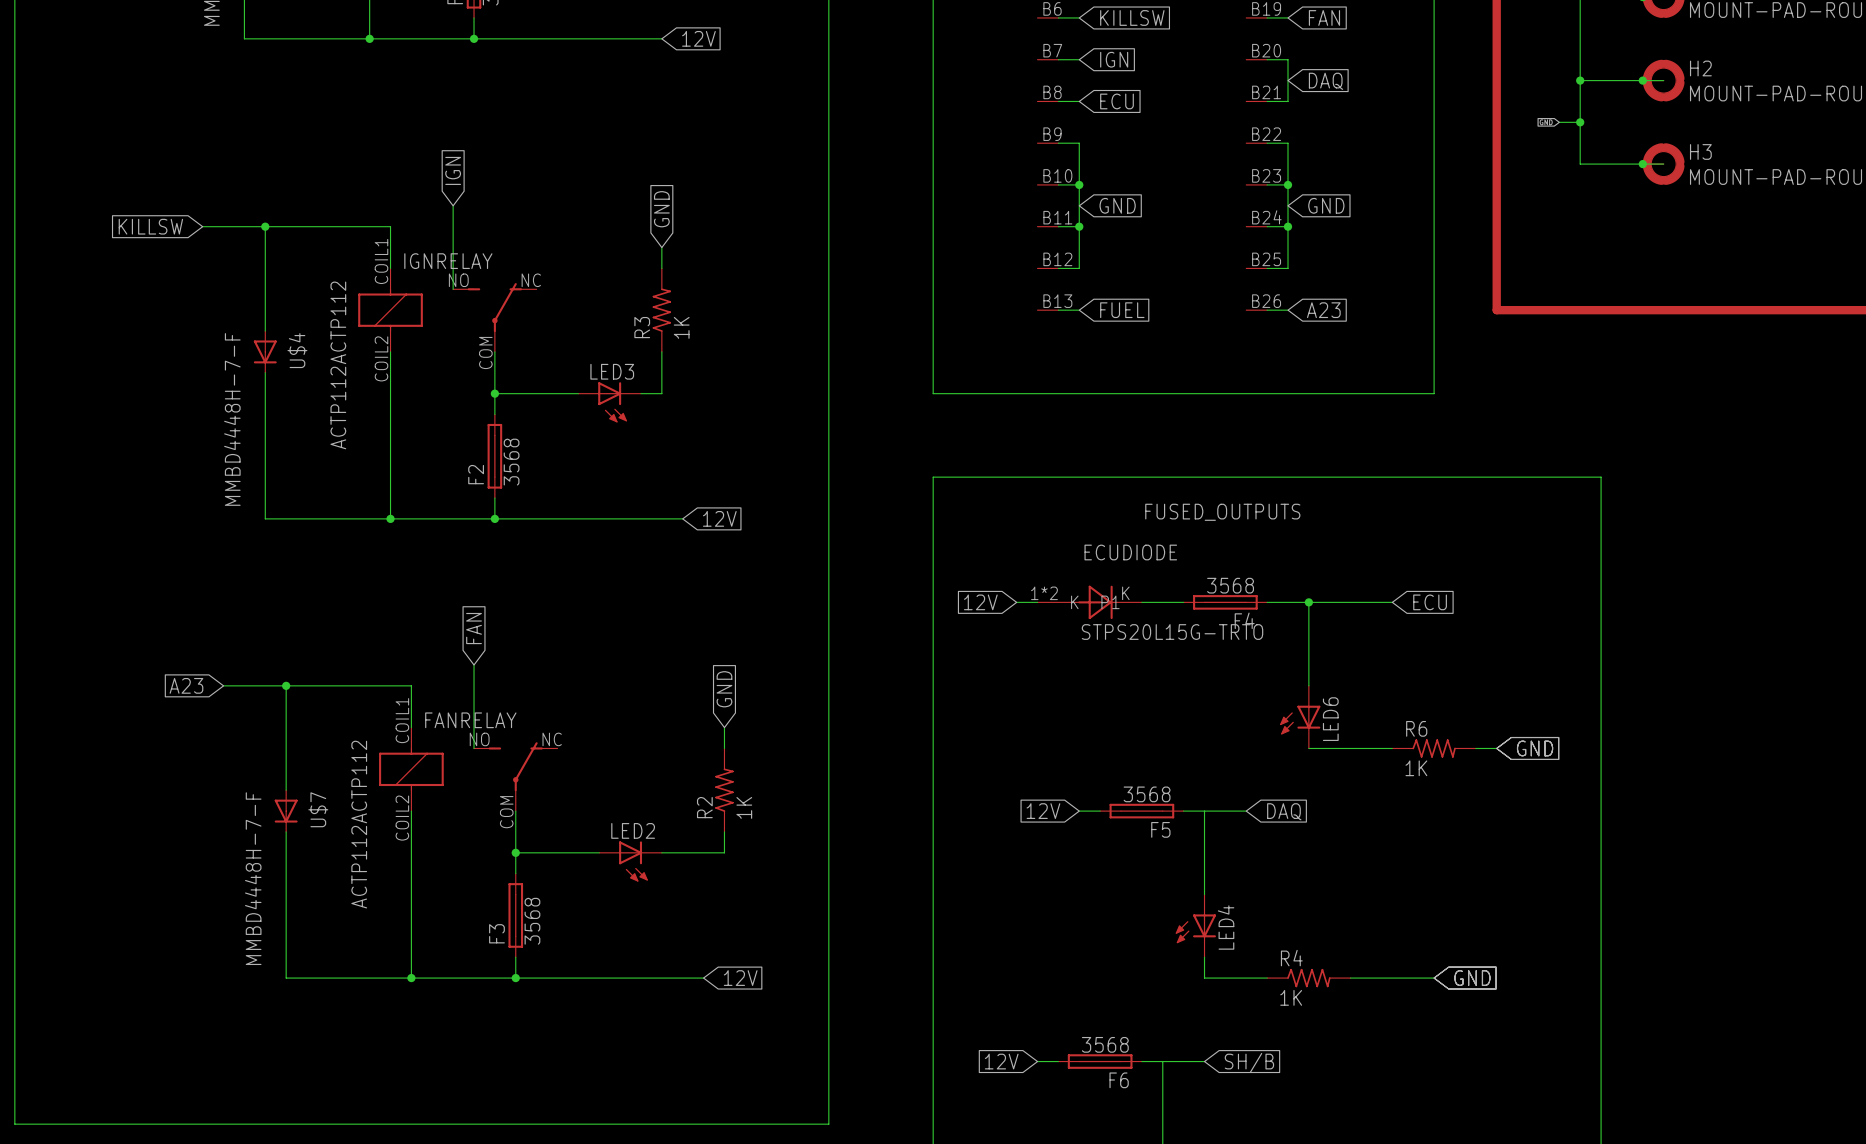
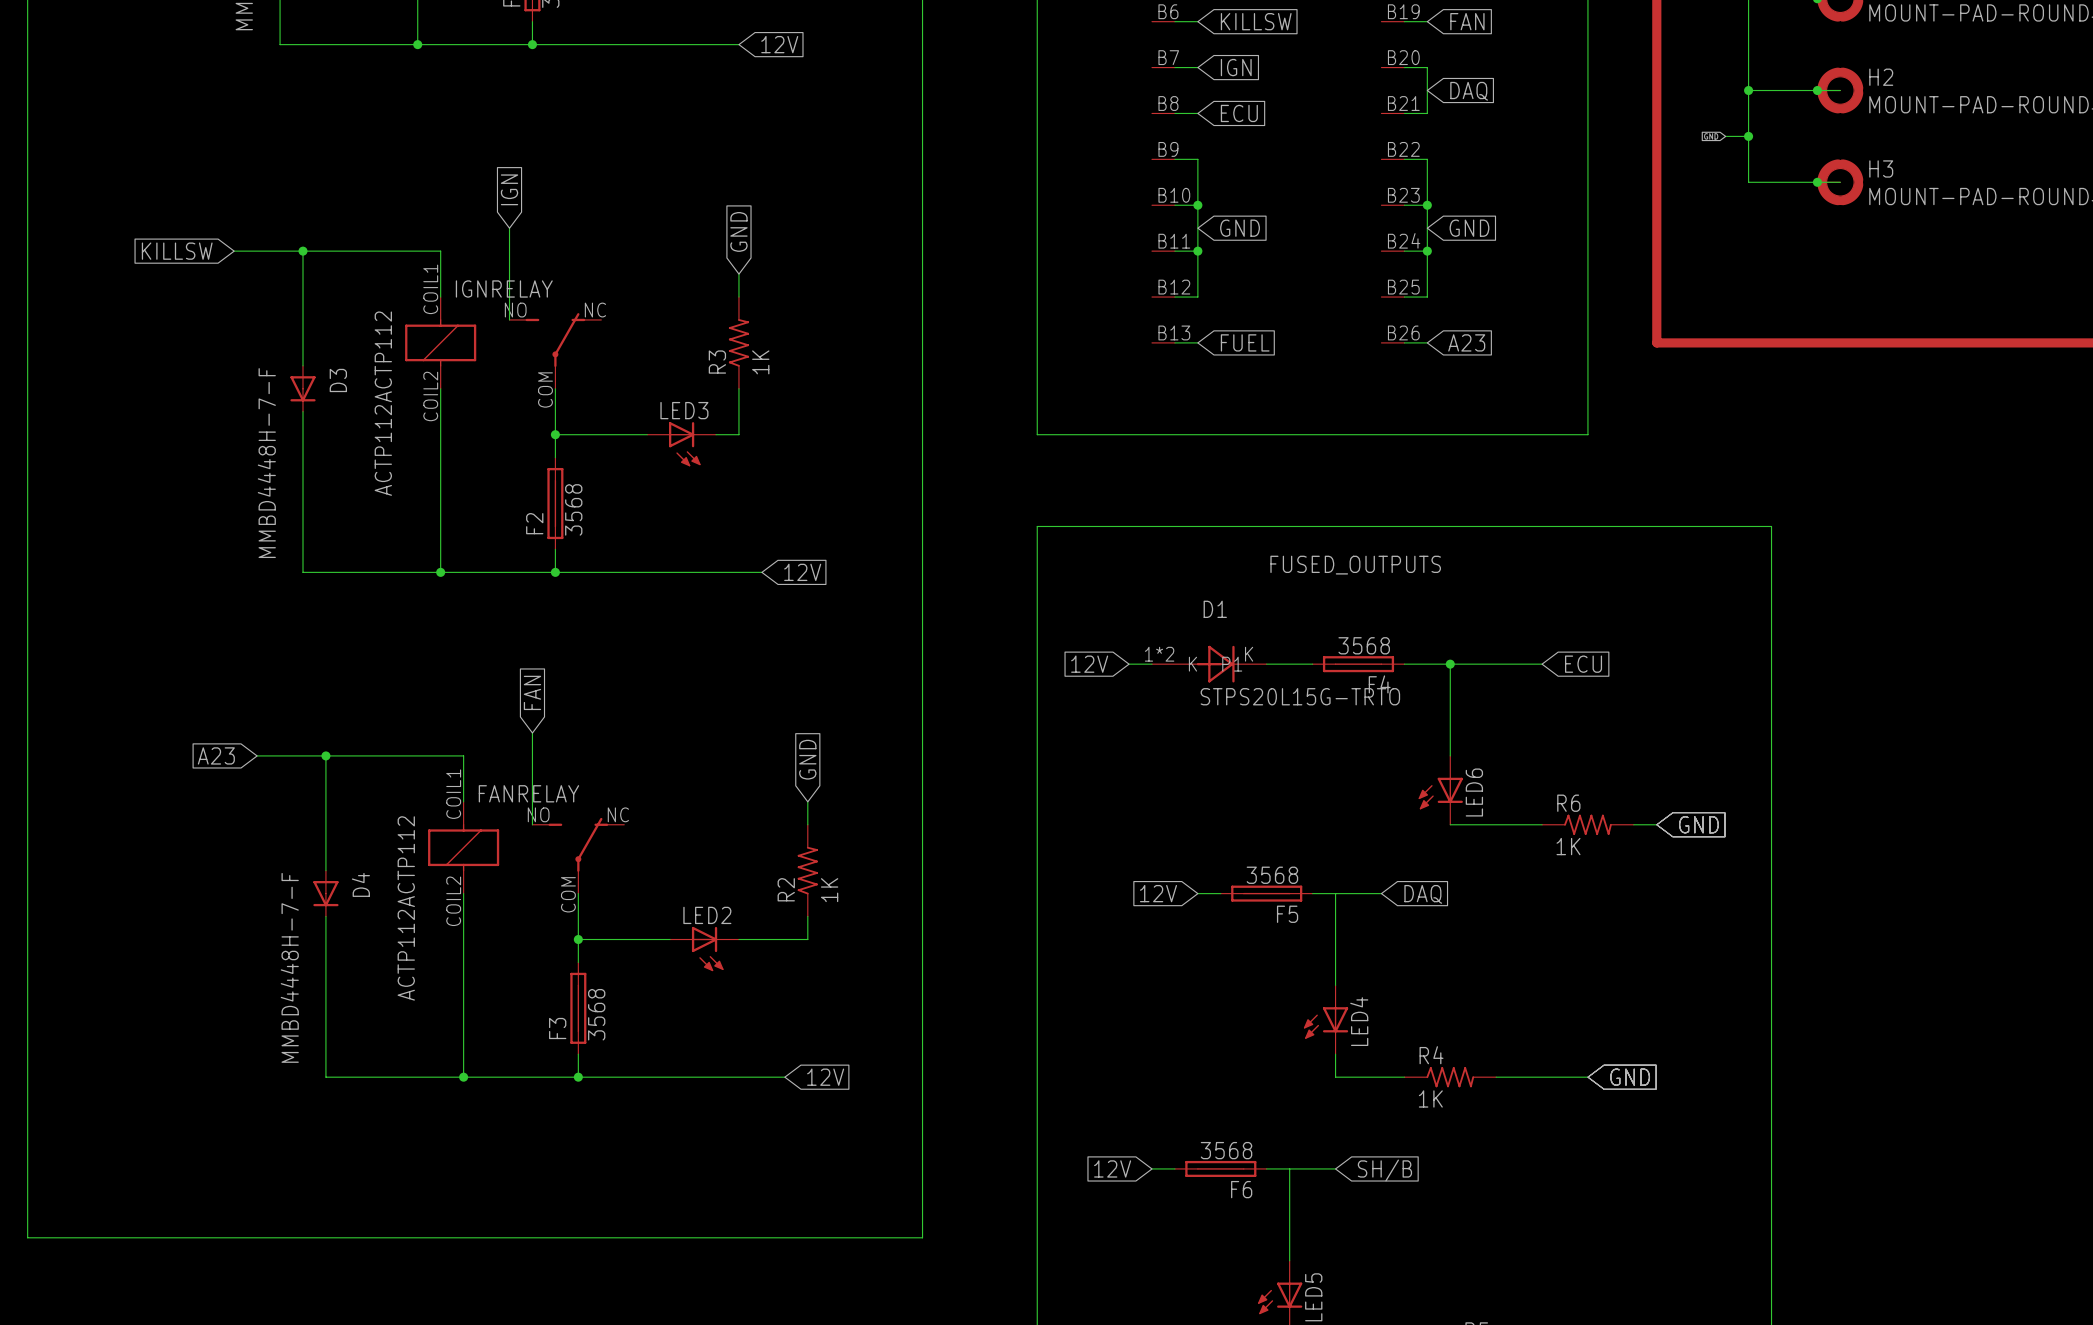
U$4 name: U$4 (297, 350) -> D3 (338, 380)
ECUDIODE name: ECUDIODE (1130, 552) -> D1 (1215, 609)
U$7 name: U$7 (318, 809) -> D4 (360, 884)

